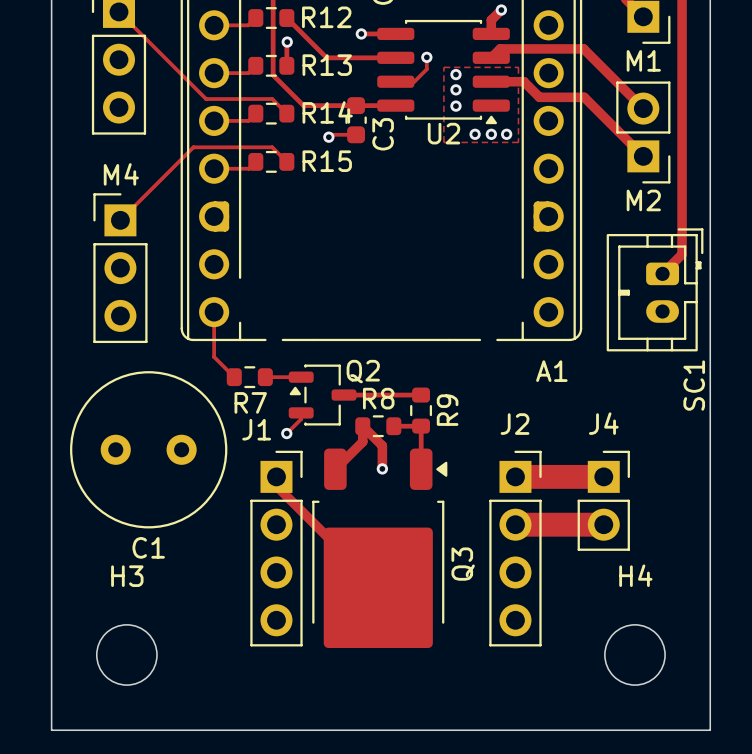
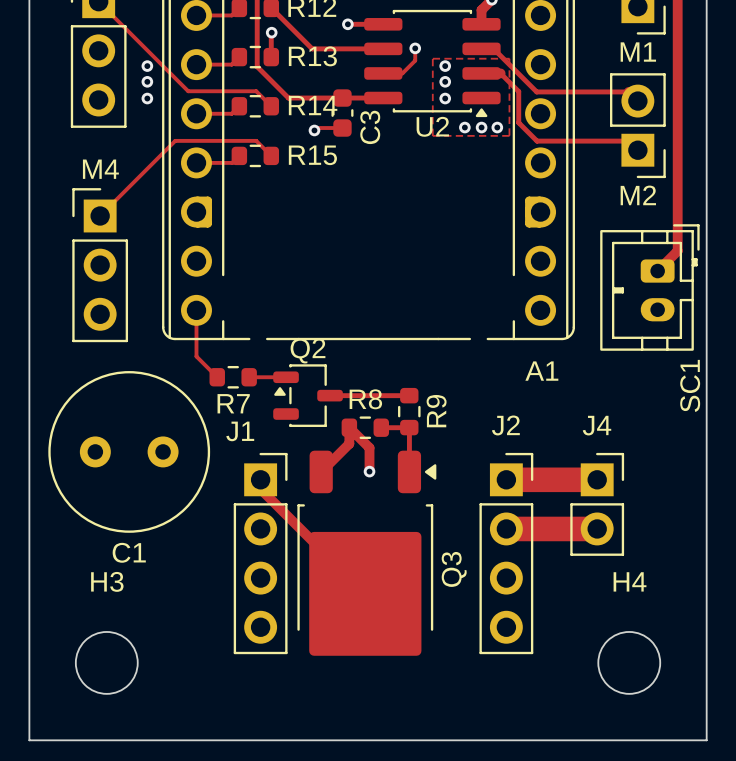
track: (491, 57) (500, 48) (583, 48) (634, 99) -> (481, 48) (493, 48) (536, 91) (628, 91)
via: none -> (147, 66)
track: (509, 81) (523, 81) (539, 97) (584, 97) (634, 147) -> (500, 73) (518, 91) (518, 122) (537, 141) (628, 141)
via: none -> (147, 81)
via: none -> (147, 98)
Q2 name position: Q2 (363, 371) -> Q2 (308, 350)
track: (301, 412) (301, 419) (286, 433) -> none
via: (286, 433) -> none

